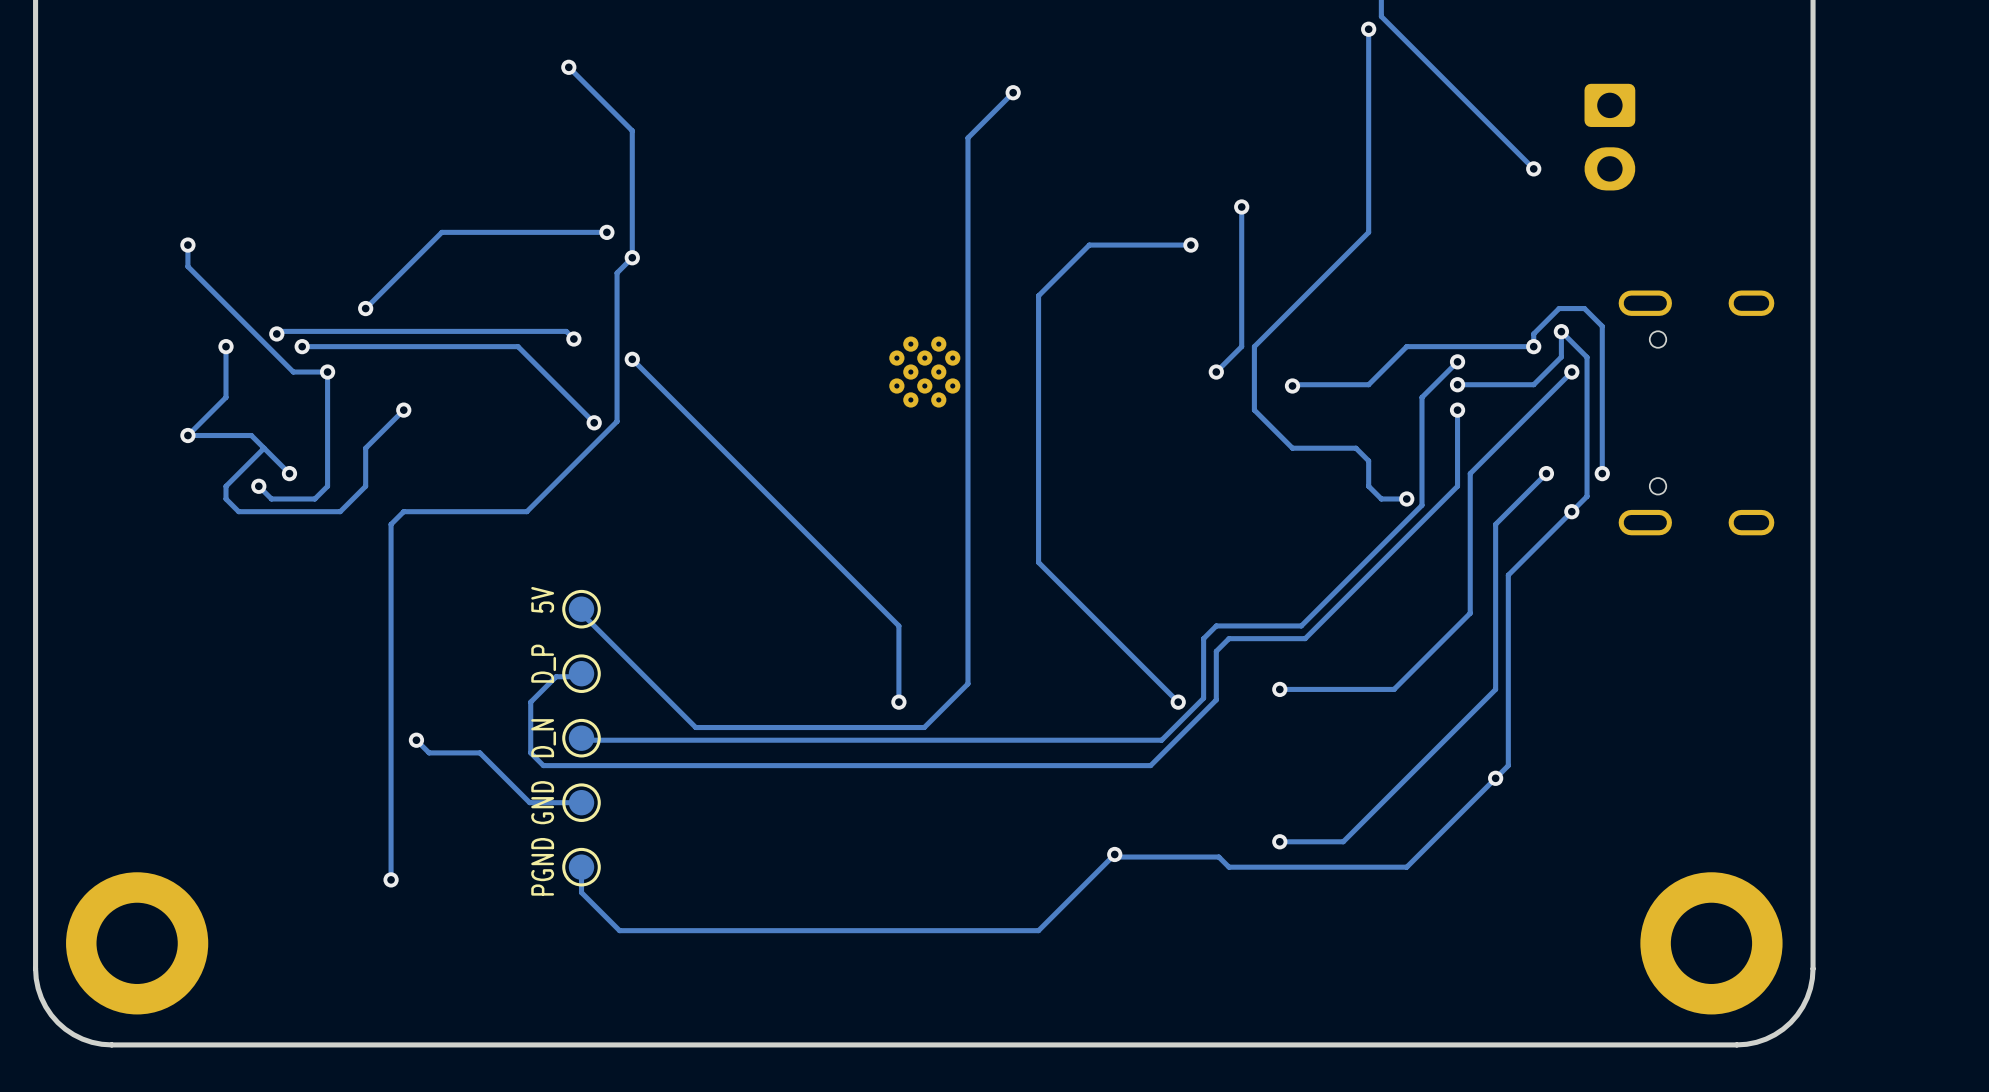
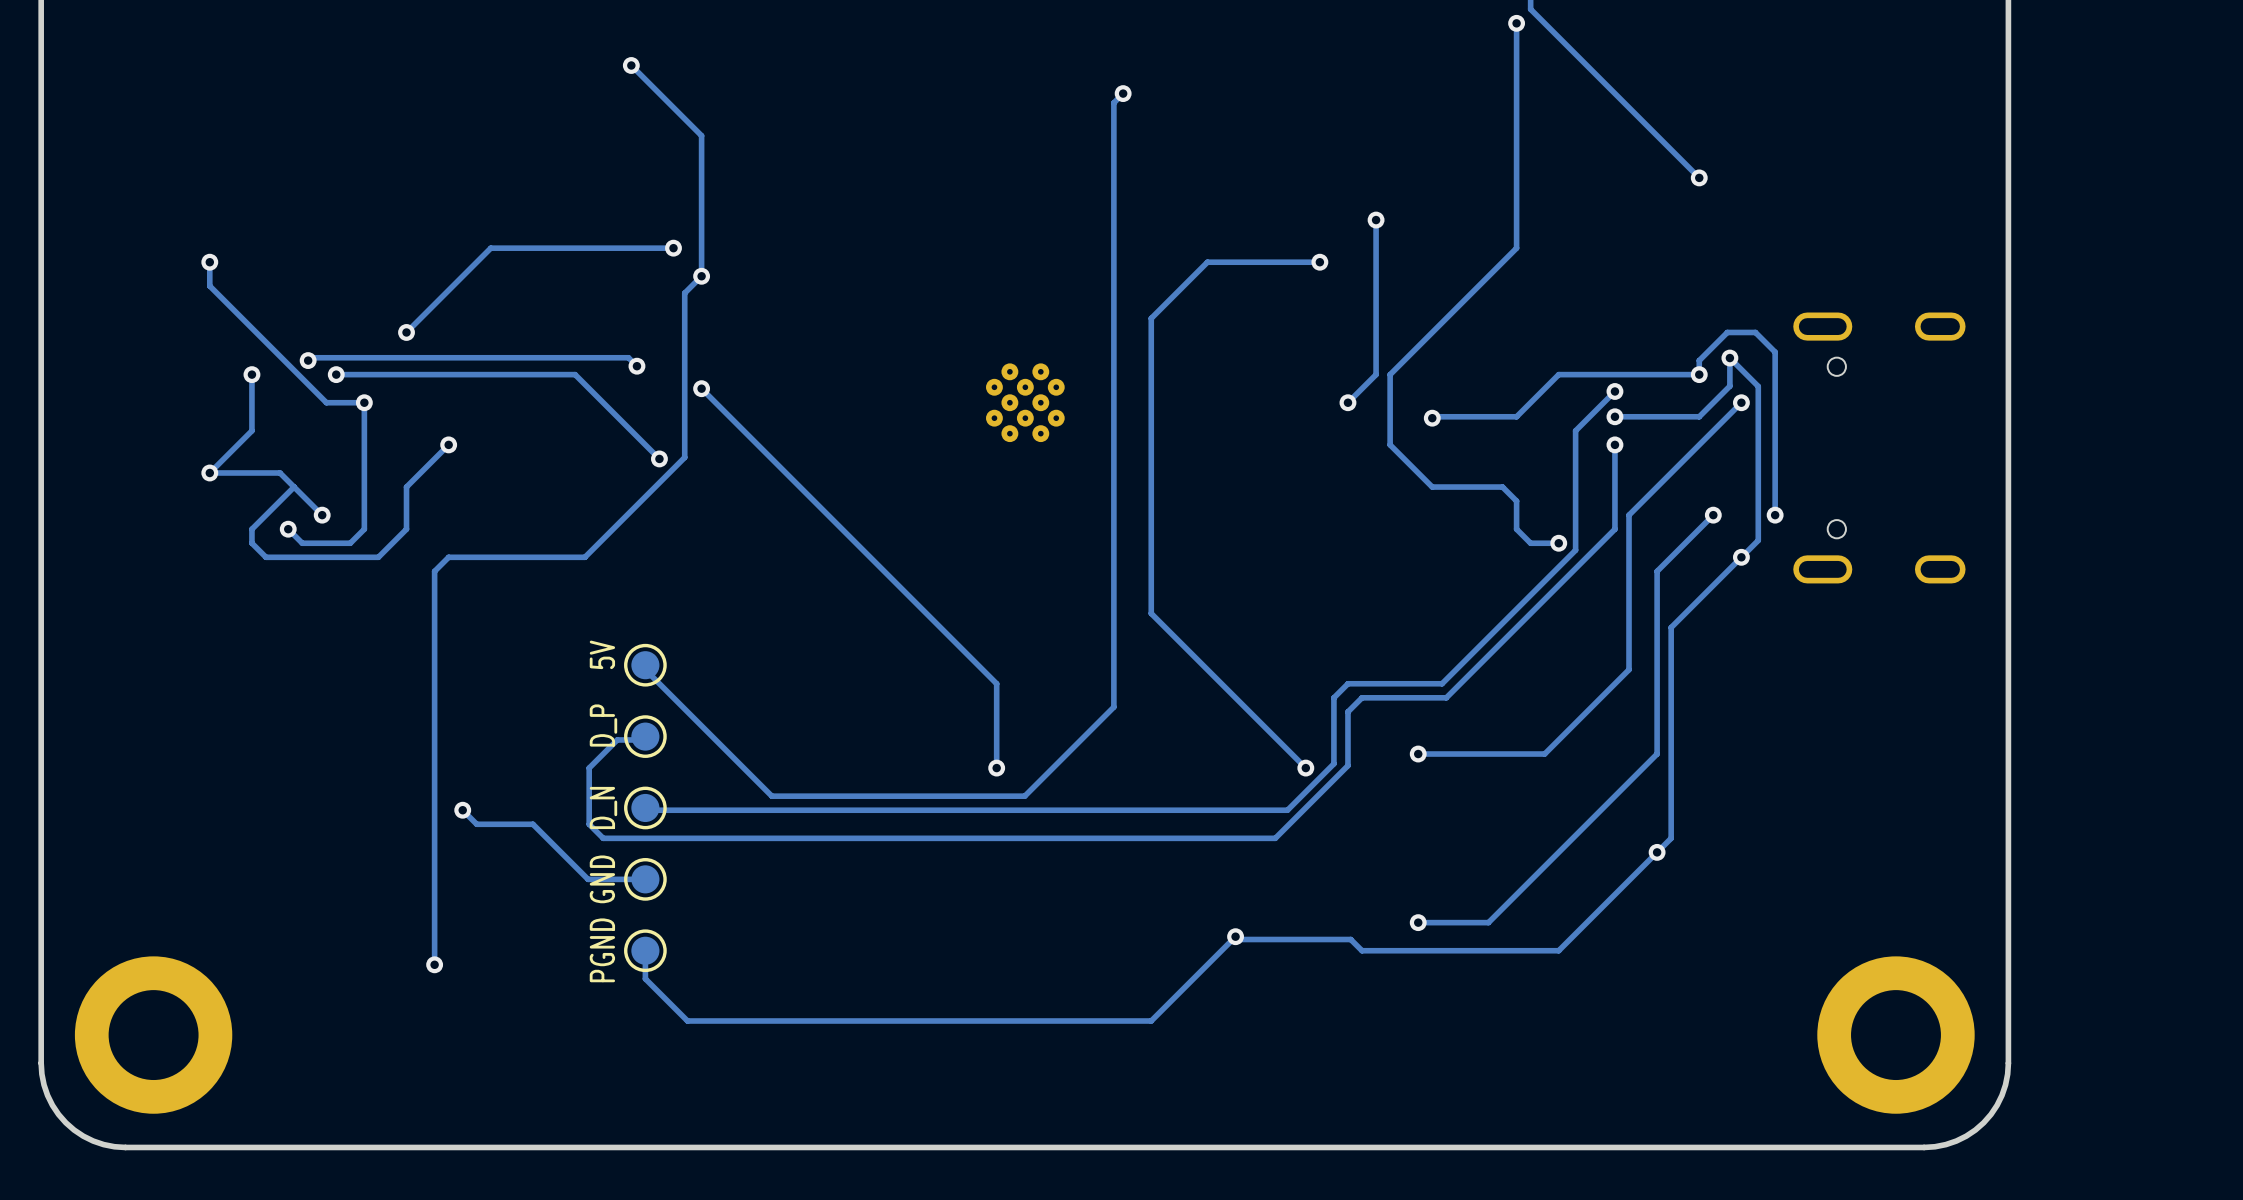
track: (1004, 101) (967, 137) (967, 683) -> (1113, 102) (1113, 707) (1073, 747)
part: (1609, 137) -> none

